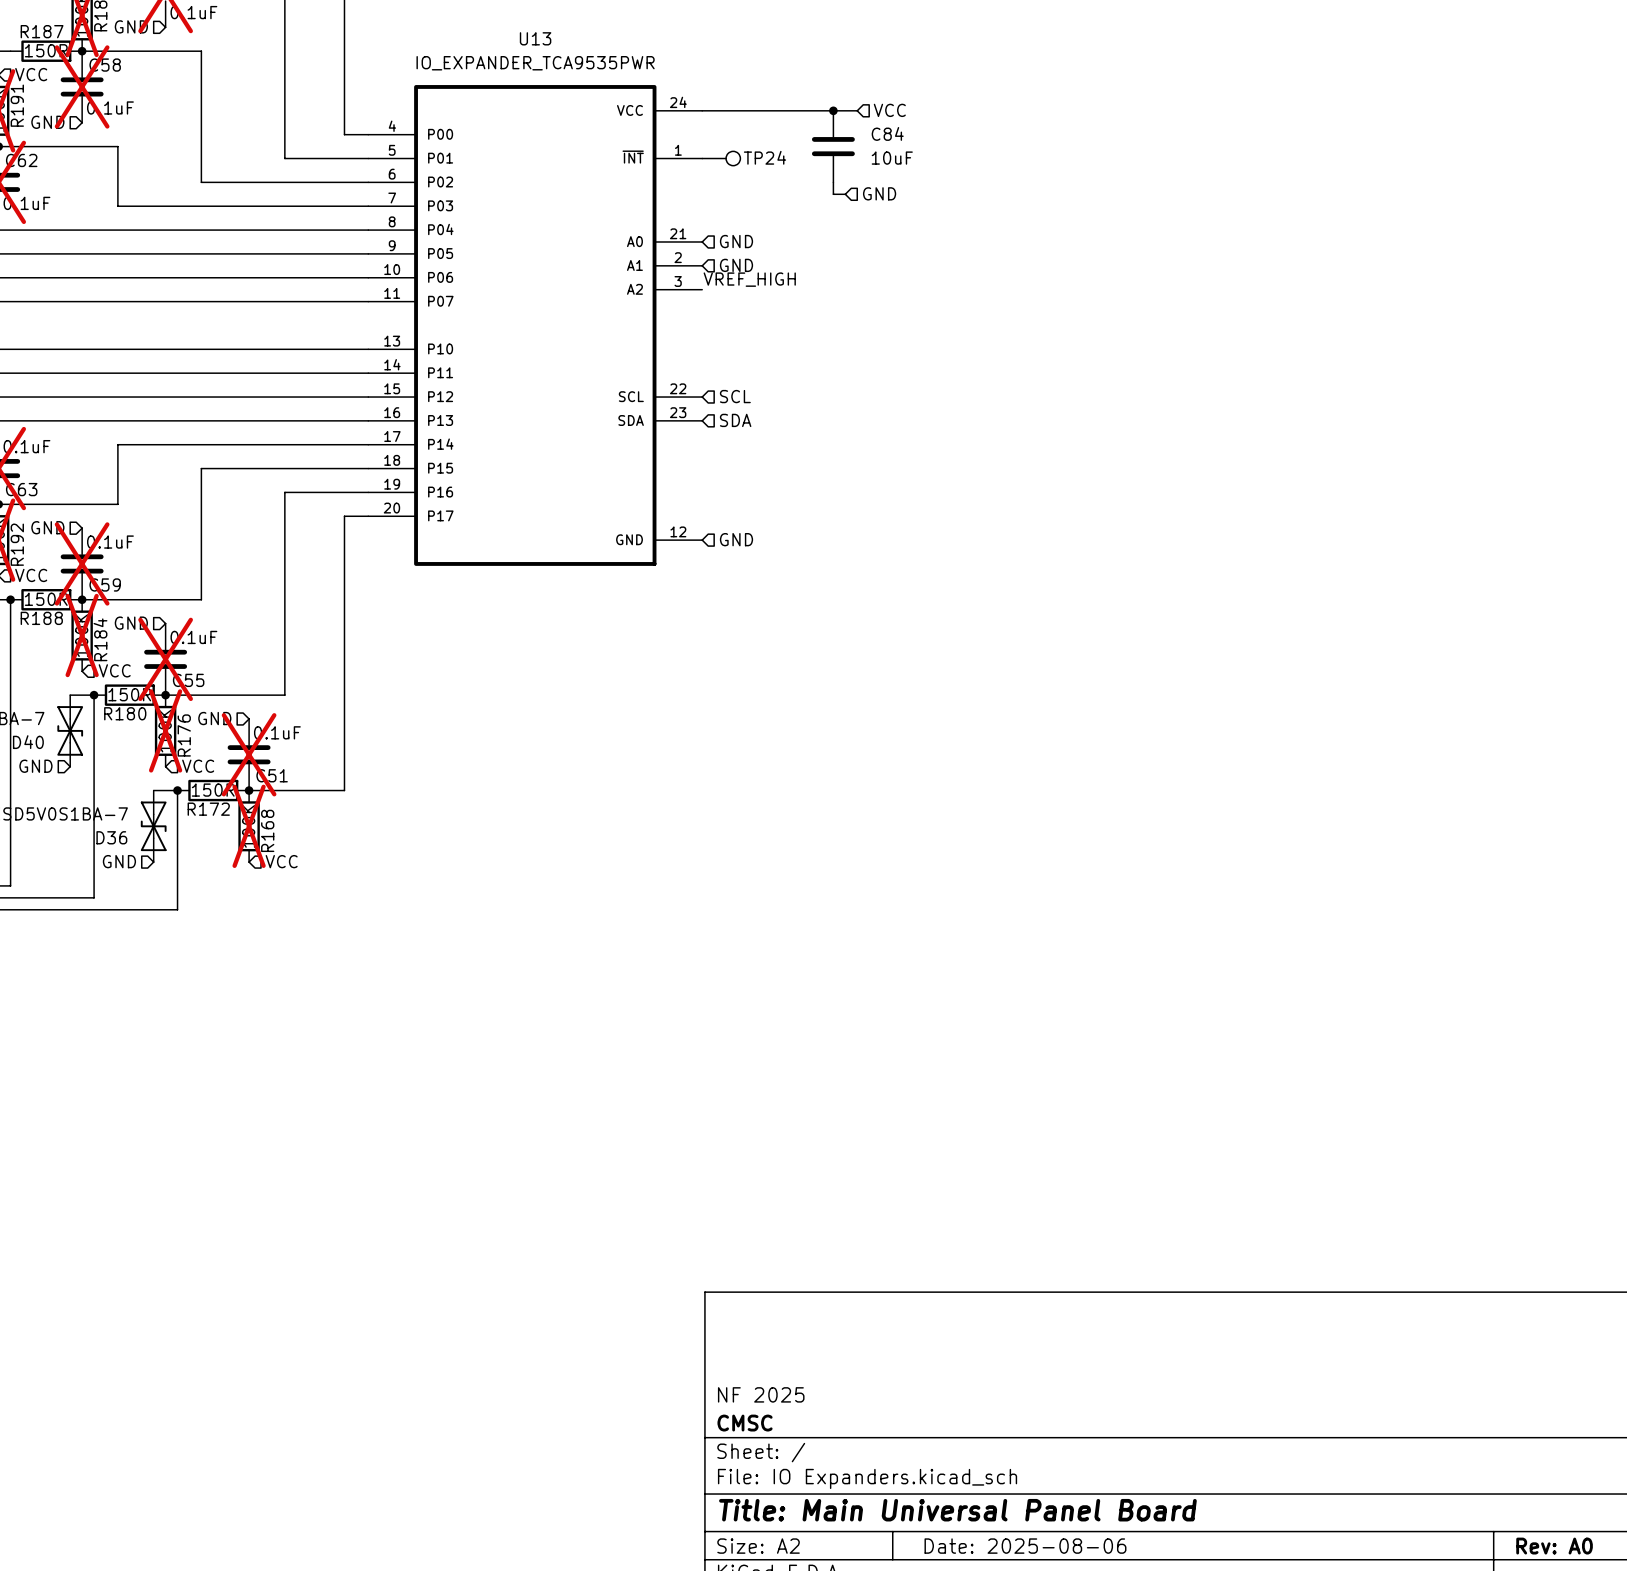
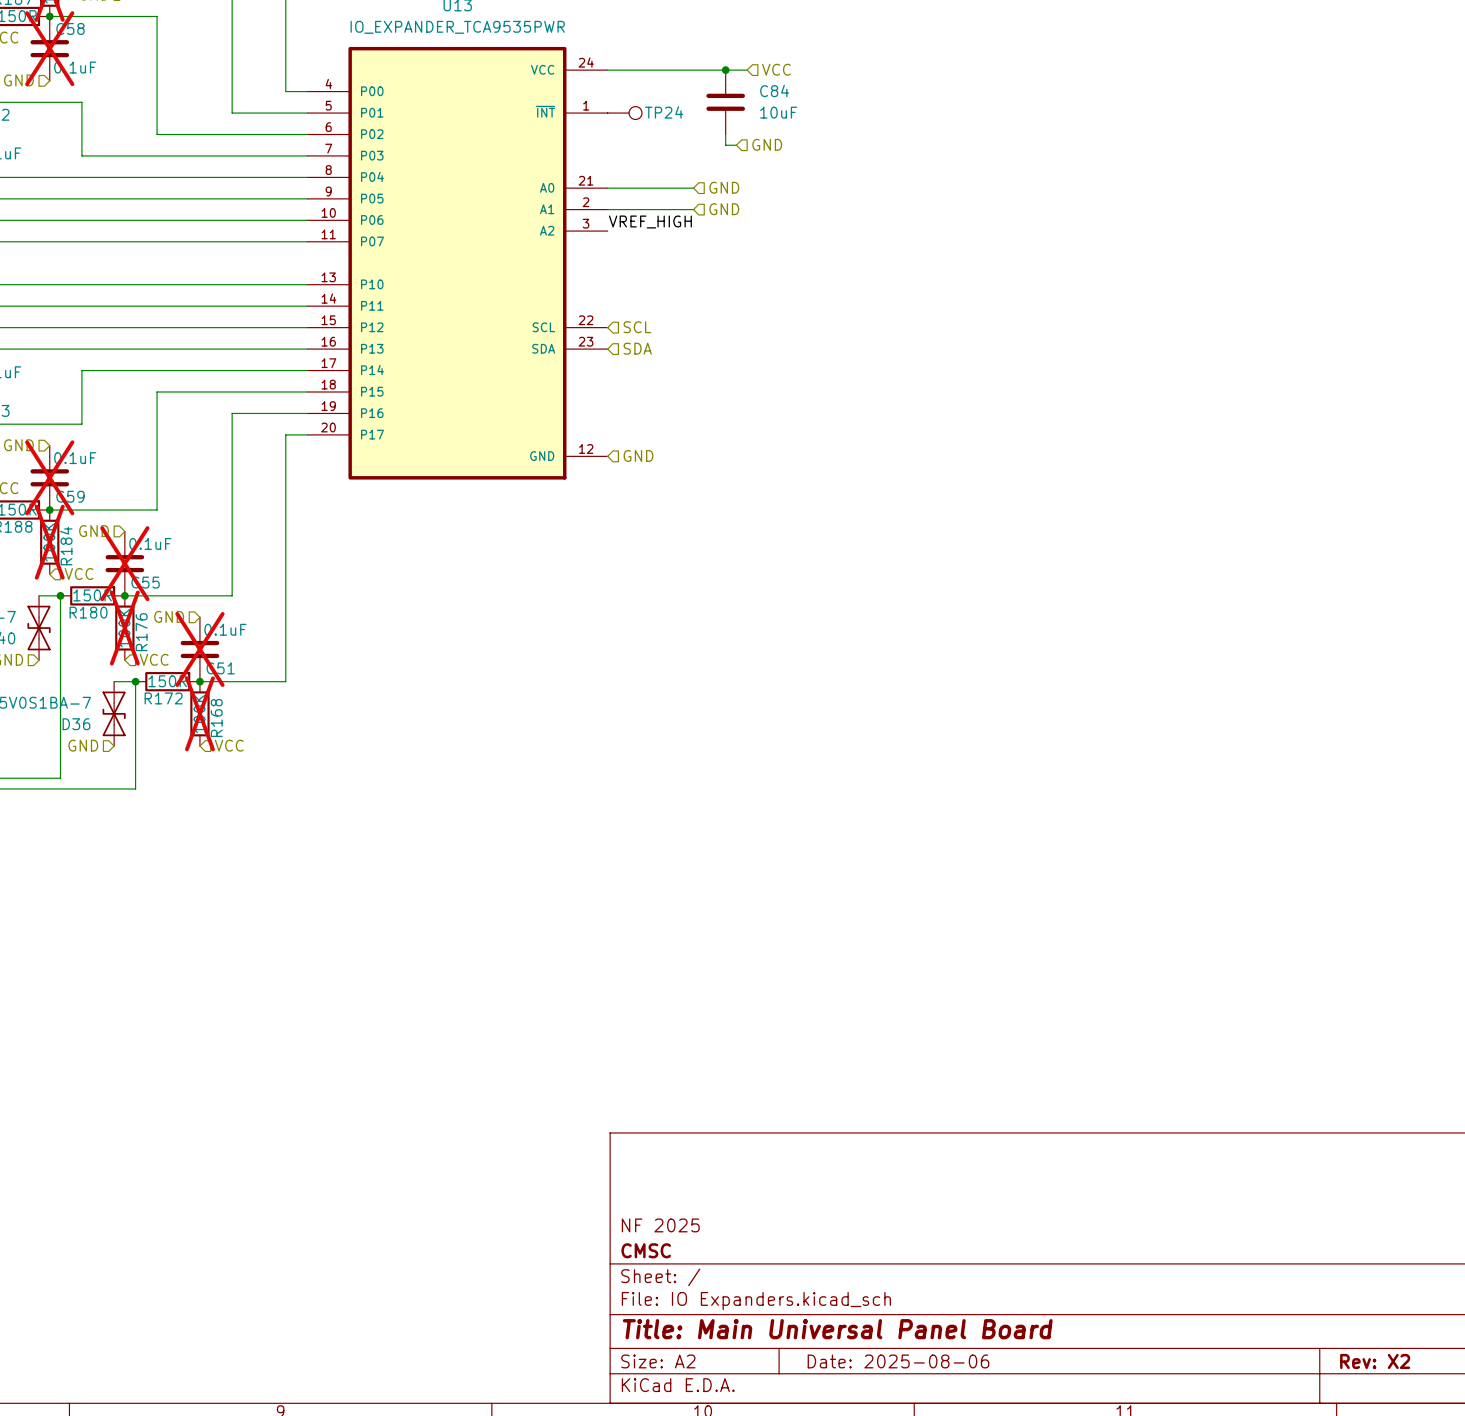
wire: none -> (607, 188) (693, 188)
hierarchical label: GND (736, 241) -> none
hierarchical label: none -> GND (724, 187)
wire: none -> (607, 209) (693, 209)
hierarchical label: GND (736, 265) -> none
hierarchical label: none -> GND (724, 209)
title block: Rev: A0 (1554, 1546) -> Rev: X2 (1375, 1361)

